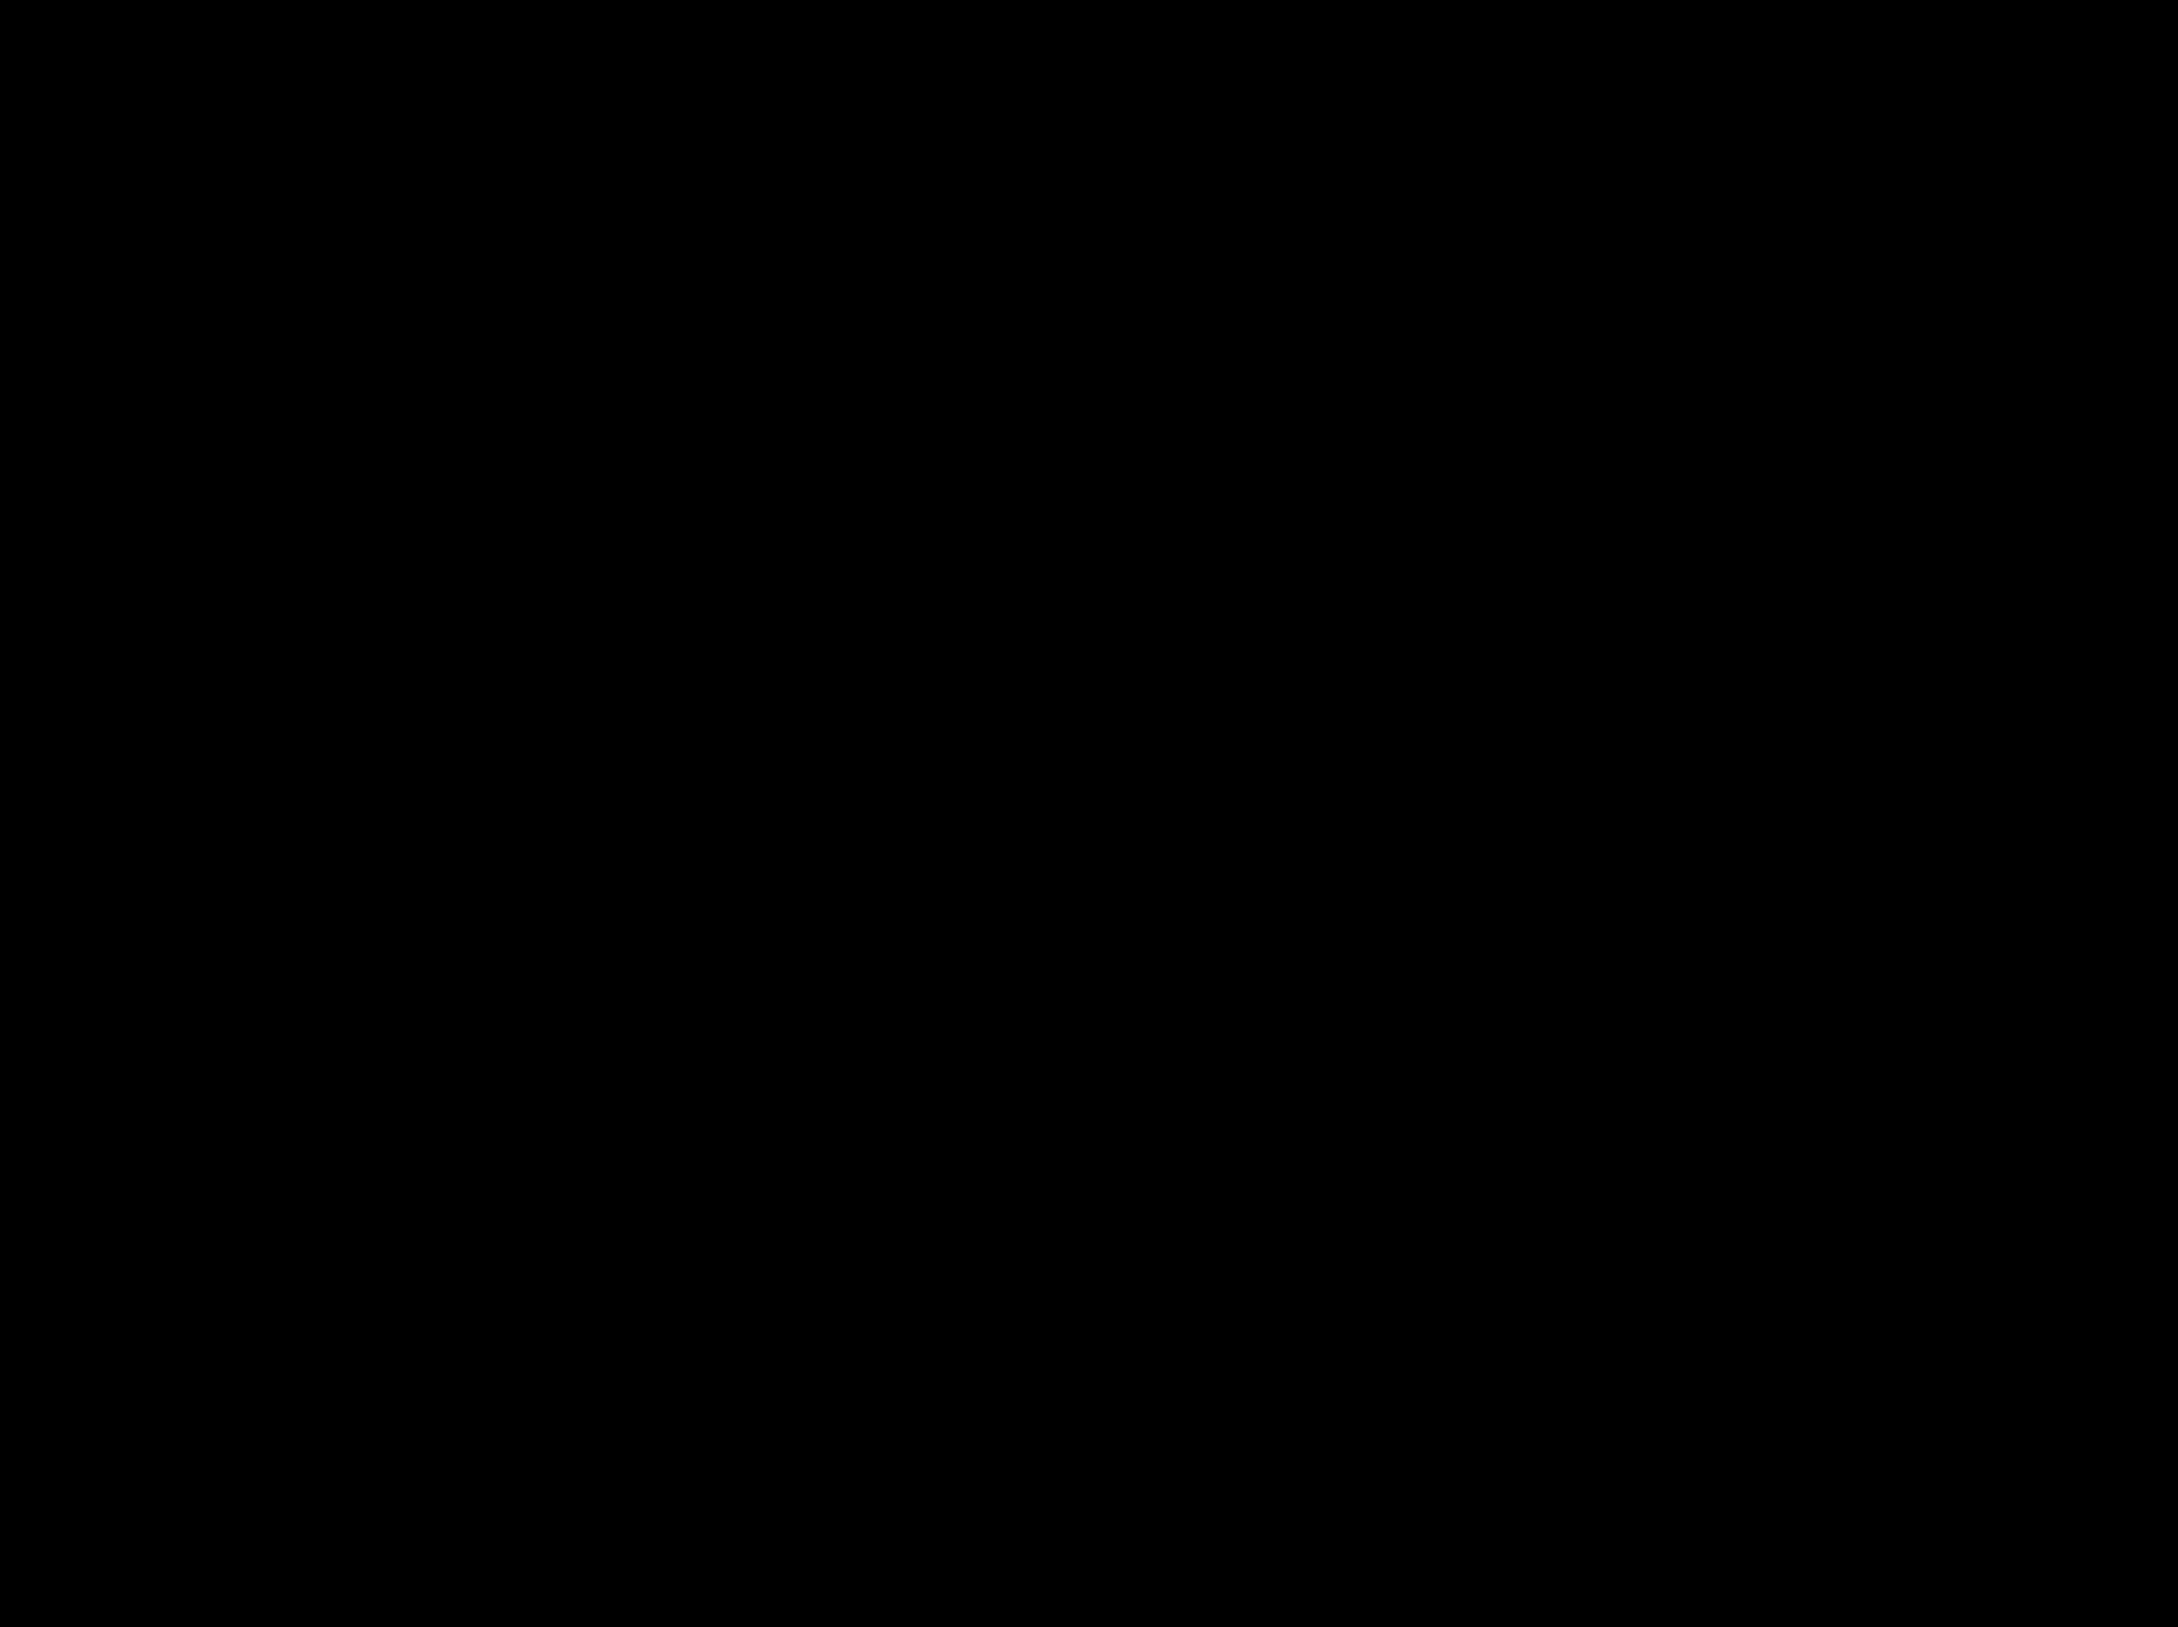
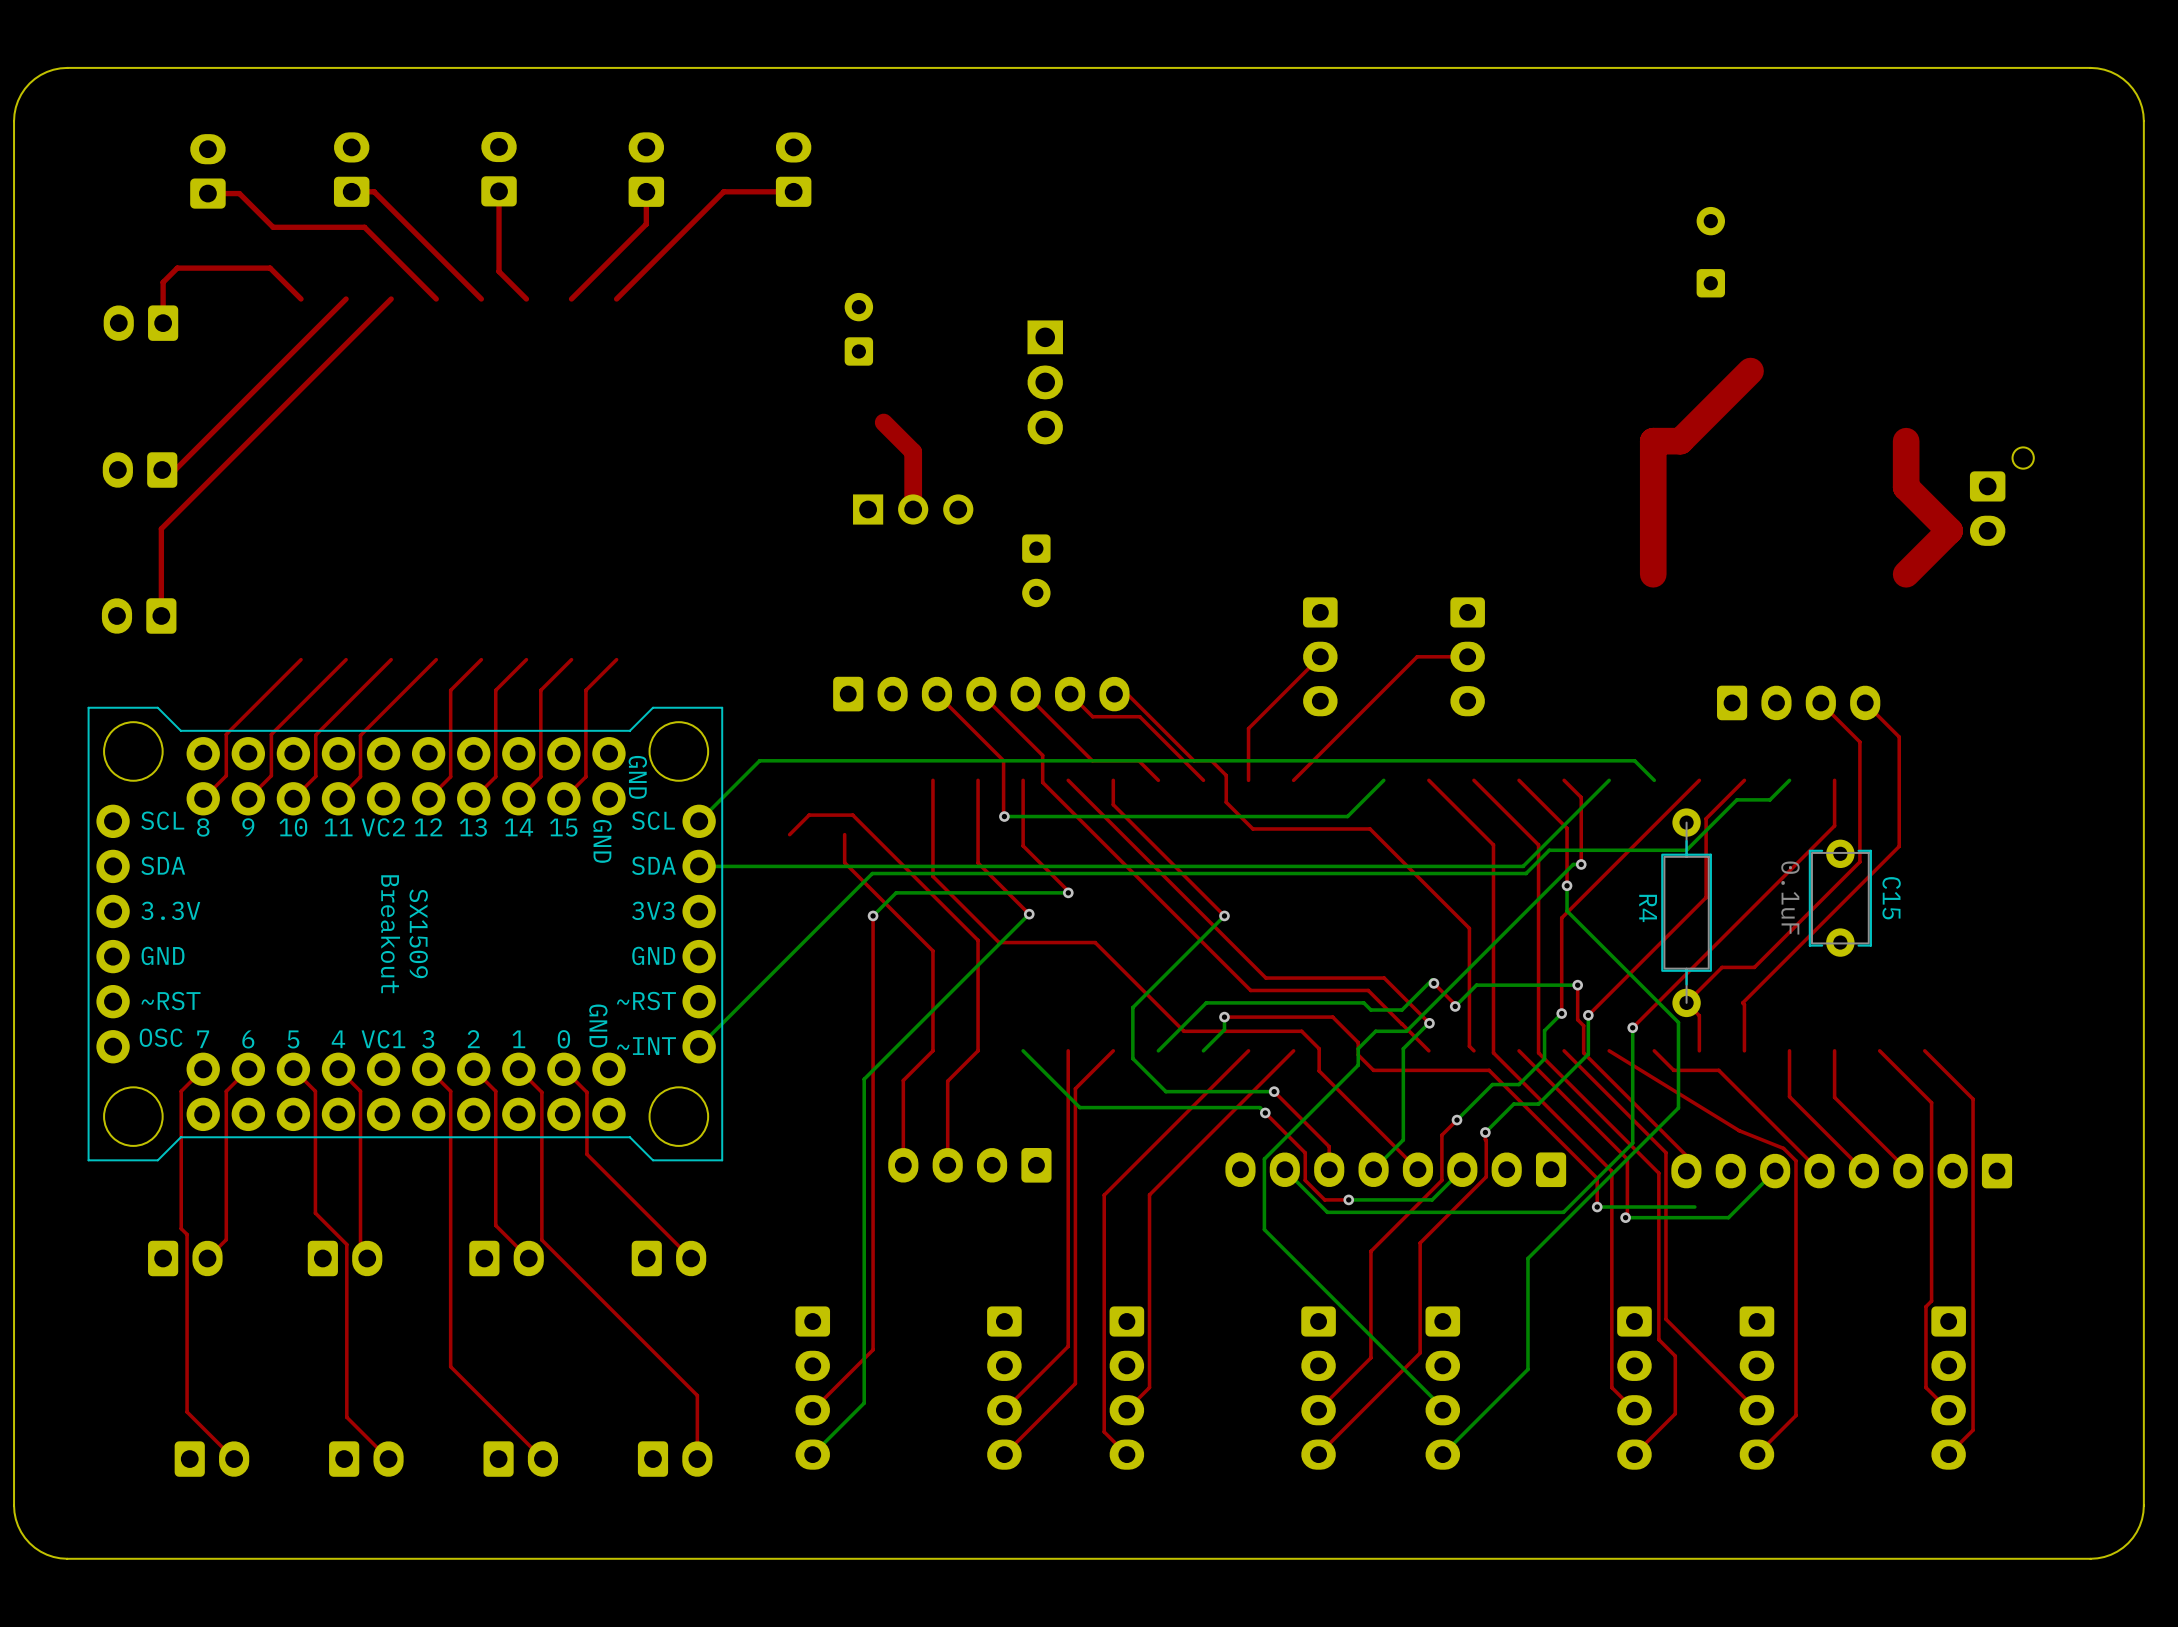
board edge: none -> (2090, 67) (67, 67) (46, 71) (34, 78) (25, 88) (18, 100) (14, 121) (14, 1505) (15, 1519) (25, 1537) (40, 1551) (53, 1556) (67, 1558) (2090, 1558) (2104, 1556) (2123, 1547) (2132, 1537) (2139, 1525) (2143, 1505) (2143, 121) (2139, 100) (2128, 83) (2110, 71) (2090, 67)
part: none -> (351, 169)
part: none -> (499, 169)
part: none -> (646, 169)
part: none -> (793, 169)
part: none -> (207, 171)
top track: none -> (351, 191) (374, 191) (481, 299)
top track: none -> (499, 191) (499, 271) (526, 299)
top track: none -> (646, 191) (646, 224) (571, 299)
top track: none -> (793, 191) (723, 191) (616, 299)
top track: none -> (207, 193) (239, 193) (273, 227) (364, 227) (436, 299)
part: none -> (1710, 252)
top track: none -> (301, 299) (270, 268) (177, 268) (163, 282) (163, 323)
top track: none -> (346, 299) (175, 470) (162, 470)
top track: none -> (391, 299) (161, 528) (161, 615)
part: none -> (140, 323)
part: none -> (858, 329)
top track: none -> (1750, 371) (1680, 441) (1653, 441) (1653, 574)
part: none -> (1045, 382)
top track: none -> (883, 422) (913, 451) (913, 509)
top track: none -> (1906, 441) (1906, 487) (1949, 530) (1906, 574)
part: none -> (140, 470)
part: none -> (2001, 496)
part: none -> (913, 509)
part: none -> (1036, 570)
part: none -> (139, 615)
top track: none -> (1320, 656) (1248, 728) (1248, 780)
part: none -> (1320, 656)
top track: none -> (1467, 656) (1417, 656) (1293, 780)
part: none -> (1467, 656)
top track: none -> (301, 659) (226, 734) (226, 775) (203, 798)
top track: none -> (346, 659) (271, 734) (271, 775) (248, 798)
top track: none -> (391, 659) (315, 735) (315, 776) (293, 798)
top track: none -> (436, 659) (360, 735) (360, 776) (338, 798)
top track: none -> (481, 659) (450, 690) (450, 776) (428, 798)
top track: none -> (526, 659) (495, 690) (495, 776) (473, 798)
top track: none -> (571, 659) (540, 690) (540, 776) (518, 798)
top track: none -> (616, 659) (585, 690) (585, 776) (563, 798)
top track: none -> (936, 694) (1003, 760) (1004, 816)
top track: none -> (981, 694) (1042, 755) (1042, 782) (1250, 990) (1368, 990) (1401, 1024)
part: none -> (981, 694)
top track: none -> (1025, 694) (1092, 760) (1138, 760) (1158, 780)
top track: none -> (1070, 694) (1092, 716) (1139, 716) (1203, 780)
top track: none -> (1114, 694) (1127, 694) (1193, 760) (1211, 760) (1226, 775) (1226, 802) (1252, 828) (1370, 828) (1469, 928) (1469, 1046) (1473, 1050)
part: none -> (1798, 702)
top track: none -> (1820, 702) (1859, 742) (1859, 861) (1754, 967) (1722, 967) (1686, 1002) (1699, 1015) (1699, 1050)
top track: none -> (1865, 702) (1899, 736) (1899, 846) (1742, 1002) (1744, 1004) (1744, 1050)
top track: none -> (932, 780) (932, 876) (999, 942) (1095, 942) (1183, 1031) (1301, 1031) (1319, 1048) (1319, 1070) (1417, 1169)
top track: none -> (978, 780) (978, 862) (1029, 914)
top track: none -> (1023, 780) (1023, 845) (1068, 892)
top track: none -> (1068, 780) (1265, 978) (1384, 978) (1429, 1023)
top track: none -> (1113, 780) (1113, 804) (1224, 915)
bottom track: none -> (1383, 780) (1347, 816) (1004, 816)
top track: none -> (1428, 780) (1493, 844) (1493, 1052) (1611, 1171) (1611, 1387) (1634, 1410)
top track: none -> (1473, 780) (1538, 844) (1538, 1052) (1658, 1173) (1658, 1339) (1675, 1356) (1675, 1413) (1634, 1454)
top track: none -> (1519, 780) (1567, 828) (1567, 885)
top track: none -> (1564, 780) (1581, 797) (1581, 864)
bottom track: none -> (1609, 780) (1523, 866) (699, 866)
bottom track: none -> (1654, 780) (1634, 760) (759, 760) (699, 821)
top track: none -> (1699, 780) (1561, 917) (1561, 1013)
top track: none -> (1744, 780) (1706, 818) (1706, 897) (1588, 1015)
bottom track: none -> (1789, 780) (1769, 799) (1736, 799) (1686, 850) (1549, 850) (1526, 873) (872, 873) (699, 1046)
top track: none -> (1834, 780) (1834, 825) (1630, 1029)
via: none -> (1004, 816)
top track: none -> (789, 834) (809, 815) (852, 815) (978, 940) (978, 1050) (947, 1081) (947, 1165)
top track: none -> (844, 834) (844, 862) (932, 950) (932, 1050) (903, 1080) (903, 1165)
bottom track: none -> (1581, 864) (1573, 864) (1406, 1031) (1375, 1031) (1358, 1048) (1358, 1065) (1264, 1159) (1264, 1229) (1442, 1408) (1442, 1410)
via: none -> (1581, 864)
bottom track: none -> (1567, 885) (1567, 911) (1678, 1022) (1678, 1108) (1527, 1258) (1527, 1369) (1442, 1454)
via: none -> (1567, 885)
bottom track: none -> (1068, 892) (896, 892) (873, 915)
via: none -> (1068, 892)
C15: none -> 0.1uF (1840, 898)
R4: none -> (1686, 912)
top track: none -> (873, 914) (873, 1349) (812, 1410)
bottom track: none -> (1029, 914) (864, 1079) (864, 1403) (812, 1454)
via: none -> (1029, 914)
via: none -> (873, 915)
bottom track: none -> (1224, 915) (1132, 1007) (1132, 1058) (1165, 1091) (1274, 1091)
via: none -> (1224, 915)
part: none -> (405, 934)
top track: none -> (1433, 983) (1455, 1006)
bottom track: none -> (1433, 983) (1432, 979) (1401, 1010) (1370, 1010) (1363, 1002) (1206, 1002) (1158, 1050)
via: none -> (1433, 983)
top track: none -> (1577, 985) (1577, 1019) (1583, 1025) (1583, 1052) (1686, 1155) (1686, 1171)
bottom track: none -> (1577, 985) (1476, 985) (1455, 1006)
via: none -> (1577, 985)
via: none -> (1455, 1006)
bottom track: none -> (1561, 1013) (1544, 1030) (1544, 1058) (1518, 1084) (1492, 1084) (1456, 1120)
via: none -> (1561, 1013)
bottom track: none -> (1588, 1015) (1588, 1054) (1538, 1104) (1513, 1104) (1485, 1132)
via: none -> (1588, 1015)
top track: none -> (1224, 1017) (1332, 1017) (1358, 1042) (1358, 1055) (1373, 1070) (1489, 1070) (1597, 1178) (1597, 1207)
bottom track: none -> (1224, 1017) (1224, 1029) (1203, 1050)
via: none -> (1224, 1017)
bottom track: none -> (1429, 1023) (1403, 1048) (1403, 1139) (1373, 1169)
via: none -> (1429, 1023)
top track: none -> (1402, 1024) (1428, 1050)
bottom track: none -> (1632, 1027) (1632, 1143) (1563, 1212) (1327, 1212) (1284, 1169)
via: none -> (1632, 1027)
bottom track: none -> (1023, 1050) (1079, 1107) (1259, 1107) (1265, 1112)
top track: none -> (1068, 1050) (1068, 1346) (1004, 1410)
top track: none -> (1113, 1050) (1075, 1088) (1075, 1383) (1004, 1454)
top track: none -> (1248, 1050) (1104, 1195) (1104, 1431) (1126, 1454)
top track: none -> (1293, 1050) (1149, 1194) (1149, 1387) (1126, 1410)
top track: none -> (1519, 1050) (1627, 1159) (1627, 1215) (1625, 1217)
top track: none -> (1564, 1050) (1665, 1152) (1665, 1319) (1756, 1410)
top track: none -> (1609, 1050) (1739, 1130) (1783, 1148) (1795, 1160) (1795, 1415) (1756, 1454)
top track: none -> (1654, 1050) (1673, 1070) (1718, 1070) (1819, 1171)
top track: none -> (1789, 1050) (1789, 1096) (1863, 1171)
top track: none -> (1834, 1050) (1834, 1097) (1908, 1171)
top track: none -> (1879, 1050) (1931, 1102) (1931, 1301) (1925, 1306) (1925, 1387) (1948, 1410)
top track: none -> (1924, 1050) (1973, 1099) (1973, 1430) (1948, 1454)
top track: none -> (203, 1069) (181, 1091) (181, 1228) (187, 1234) (187, 1411) (234, 1459)
top track: none -> (248, 1069) (226, 1091) (226, 1239) (207, 1258)
top track: none -> (293, 1069) (315, 1091) (315, 1213) (346, 1244) (346, 1417) (388, 1459)
top track: none -> (338, 1069) (360, 1091) (360, 1251) (367, 1258)
top track: none -> (428, 1069) (450, 1091) (450, 1366) (542, 1459)
top track: none -> (473, 1069) (495, 1091) (495, 1225) (528, 1258)
top track: none -> (518, 1069) (541, 1092) (541, 1240) (697, 1395) (697, 1459)
top track: none -> (563, 1069) (586, 1092) (586, 1154) (691, 1258)
top track: none -> (1274, 1091) (1329, 1146) (1329, 1169)
via: none -> (1274, 1091)
top track: none -> (1265, 1112) (1305, 1152) (1305, 1180) (1324, 1199) (1348, 1199)
via: none -> (1265, 1112)
top track: none -> (1456, 1120) (1441, 1135) (1441, 1180) (1370, 1251) (1370, 1357) (1318, 1410)
via: none -> (1456, 1120)
top track: none -> (1485, 1132) (1486, 1176) (1420, 1243) (1420, 1353) (1318, 1454)
via: none -> (1485, 1132)
part: none -> (969, 1165)
part: none -> (1395, 1169)
bottom track: none -> (1462, 1169) (1432, 1199) (1346, 1199)
bottom track: none -> (1775, 1171) (1728, 1217) (1625, 1217)
part: none -> (1841, 1171)
via: none -> (1348, 1199)
via: none -> (1597, 1207)
bottom track: none -> (1694, 1207) (1597, 1207)
via: none -> (1625, 1217)
part: none -> (185, 1258)
part: none -> (345, 1258)
part: none -> (506, 1258)
part: none -> (668, 1258)
part: none -> (812, 1388)
part: none -> (1004, 1388)
part: none -> (1126, 1388)
part: none -> (1318, 1388)
part: none -> (1442, 1388)
part: none -> (1634, 1388)
part: none -> (1756, 1388)
part: none -> (1948, 1388)
part: none -> (211, 1459)
part: none -> (366, 1459)
part: none -> (520, 1459)
part: none -> (675, 1459)

